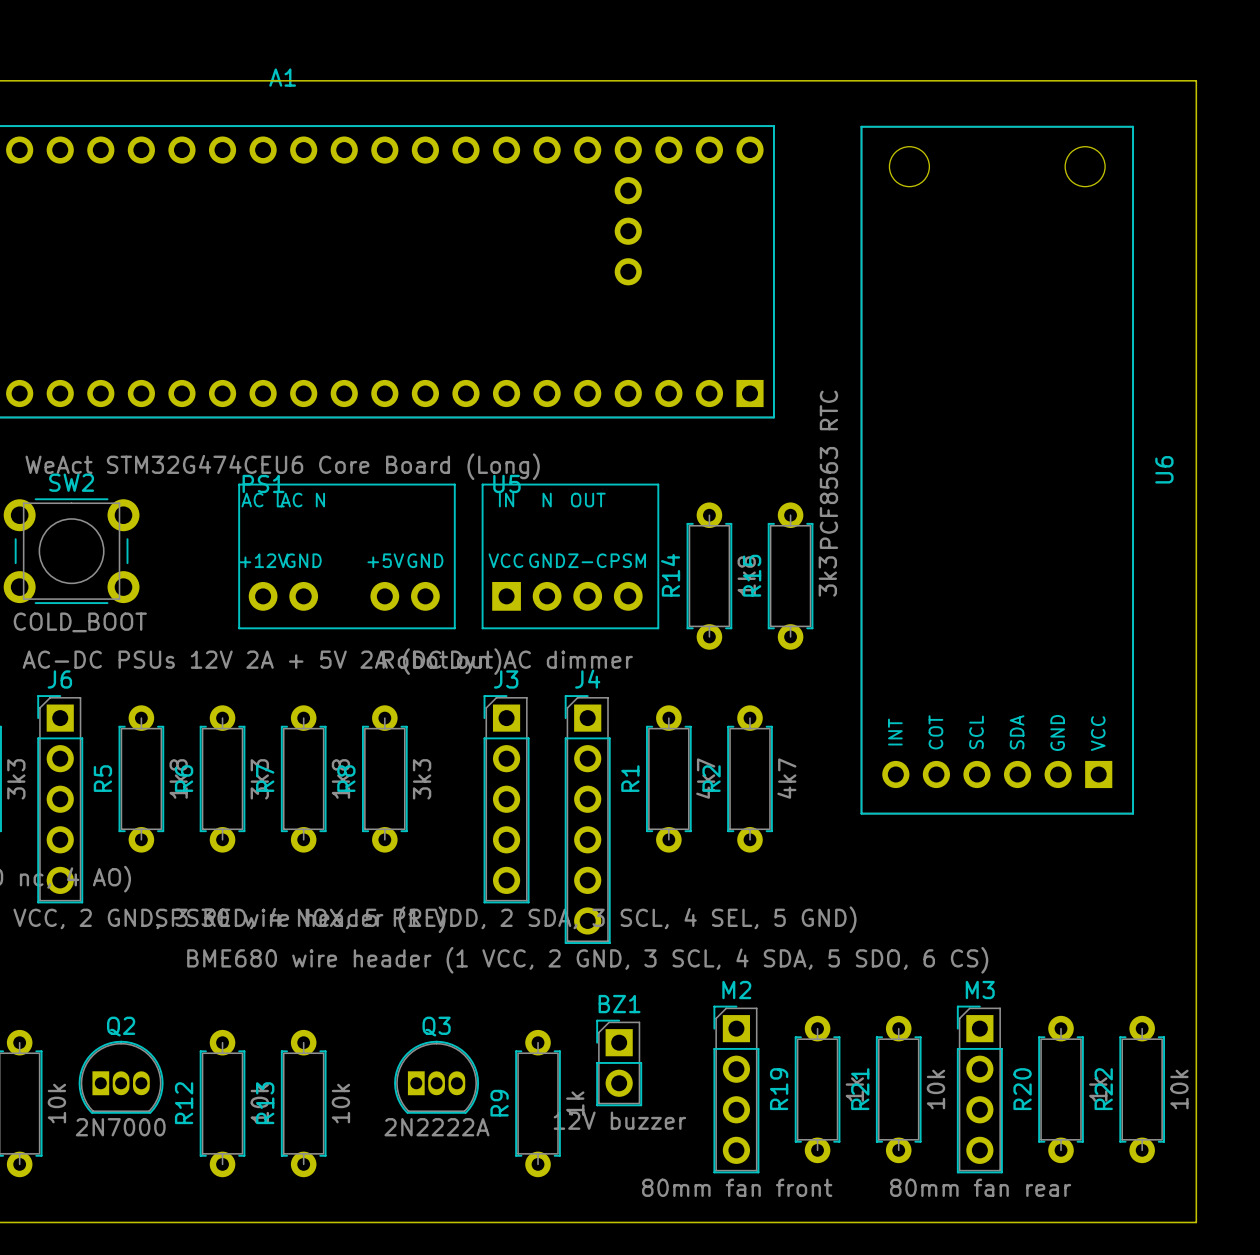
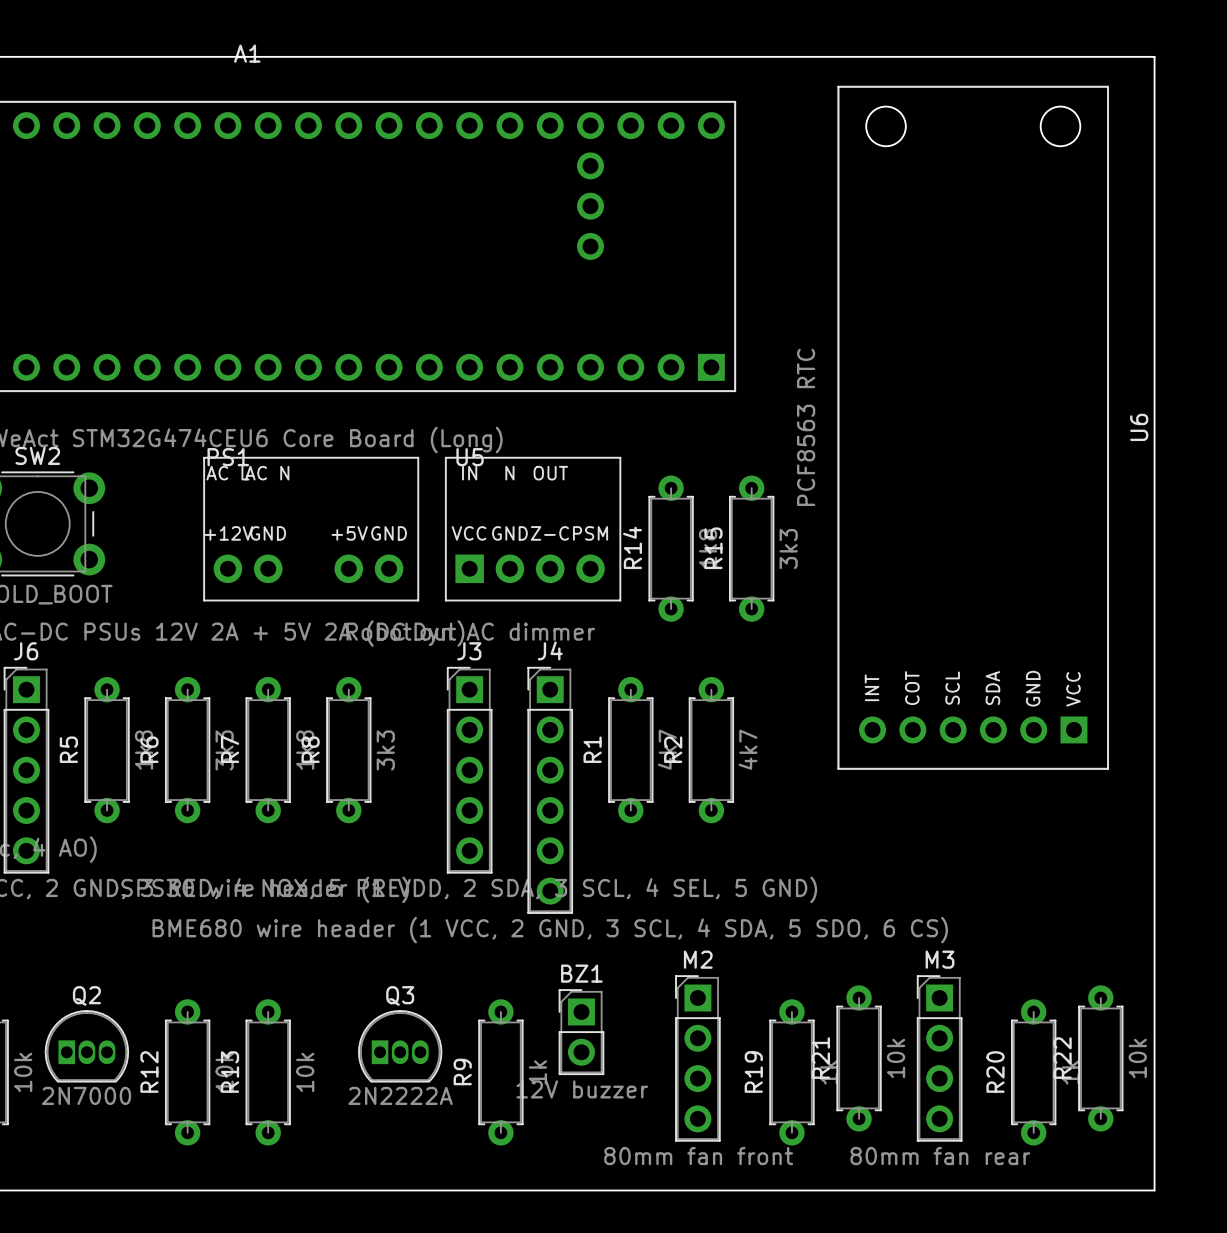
U6 position: (997, 470) -> (973, 427)
R19 position: (817, 1089) -> (791, 1072)
R20 position: (1061, 1089) -> (1033, 1072)

